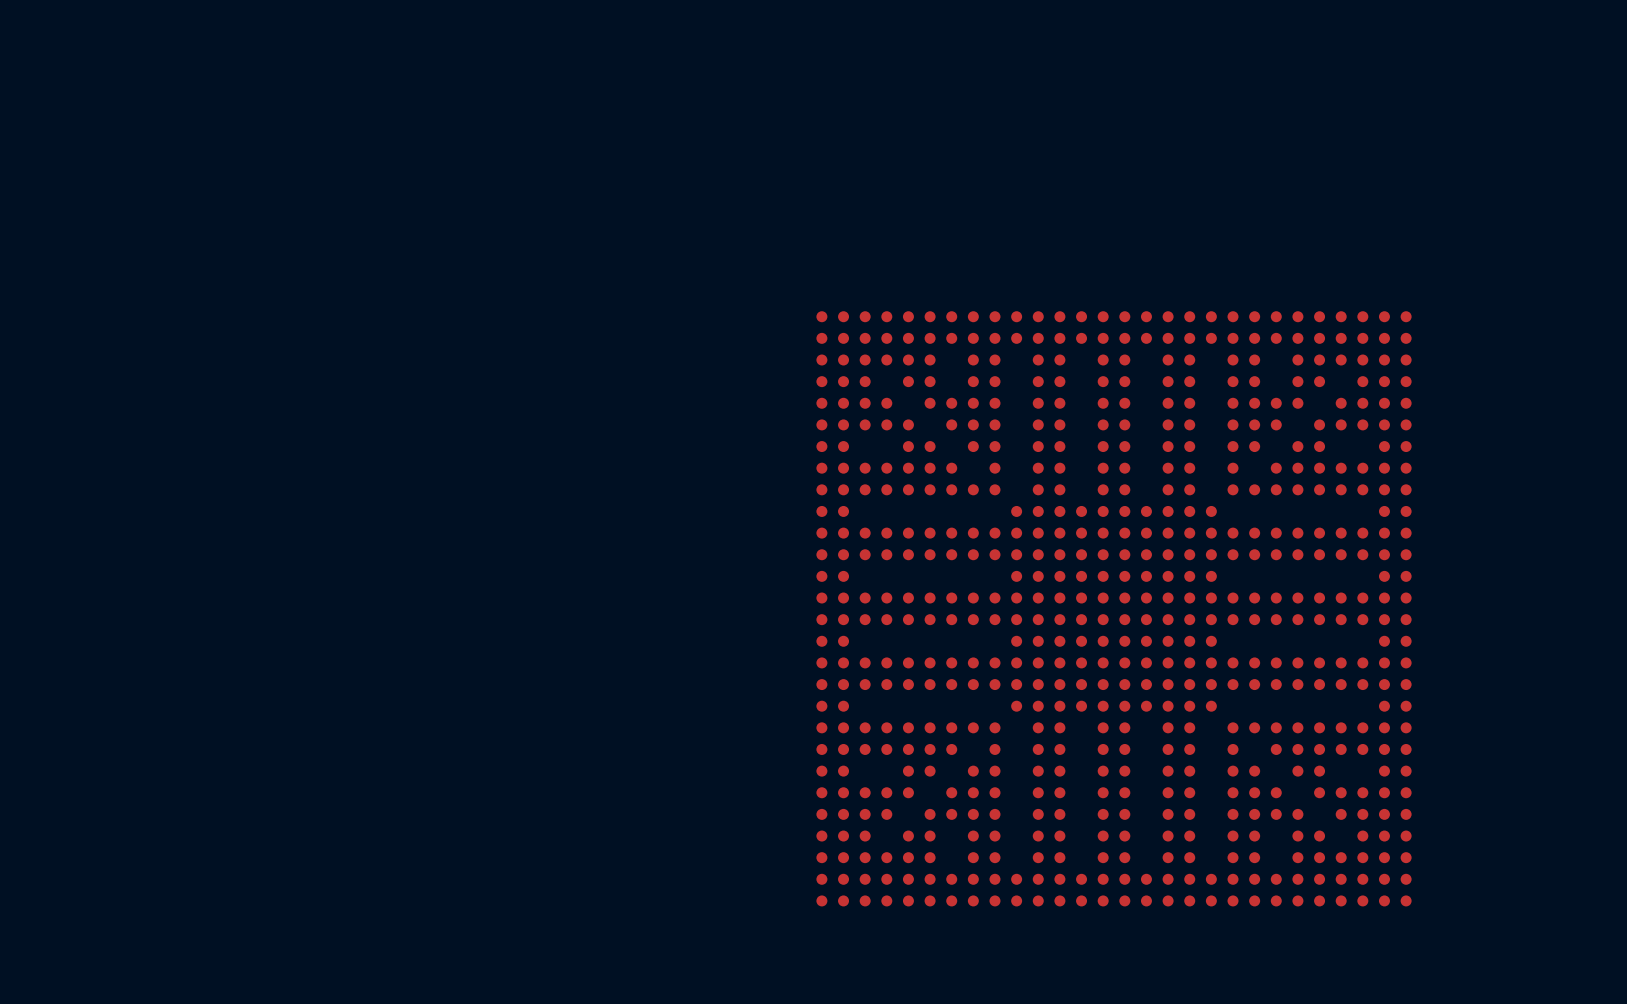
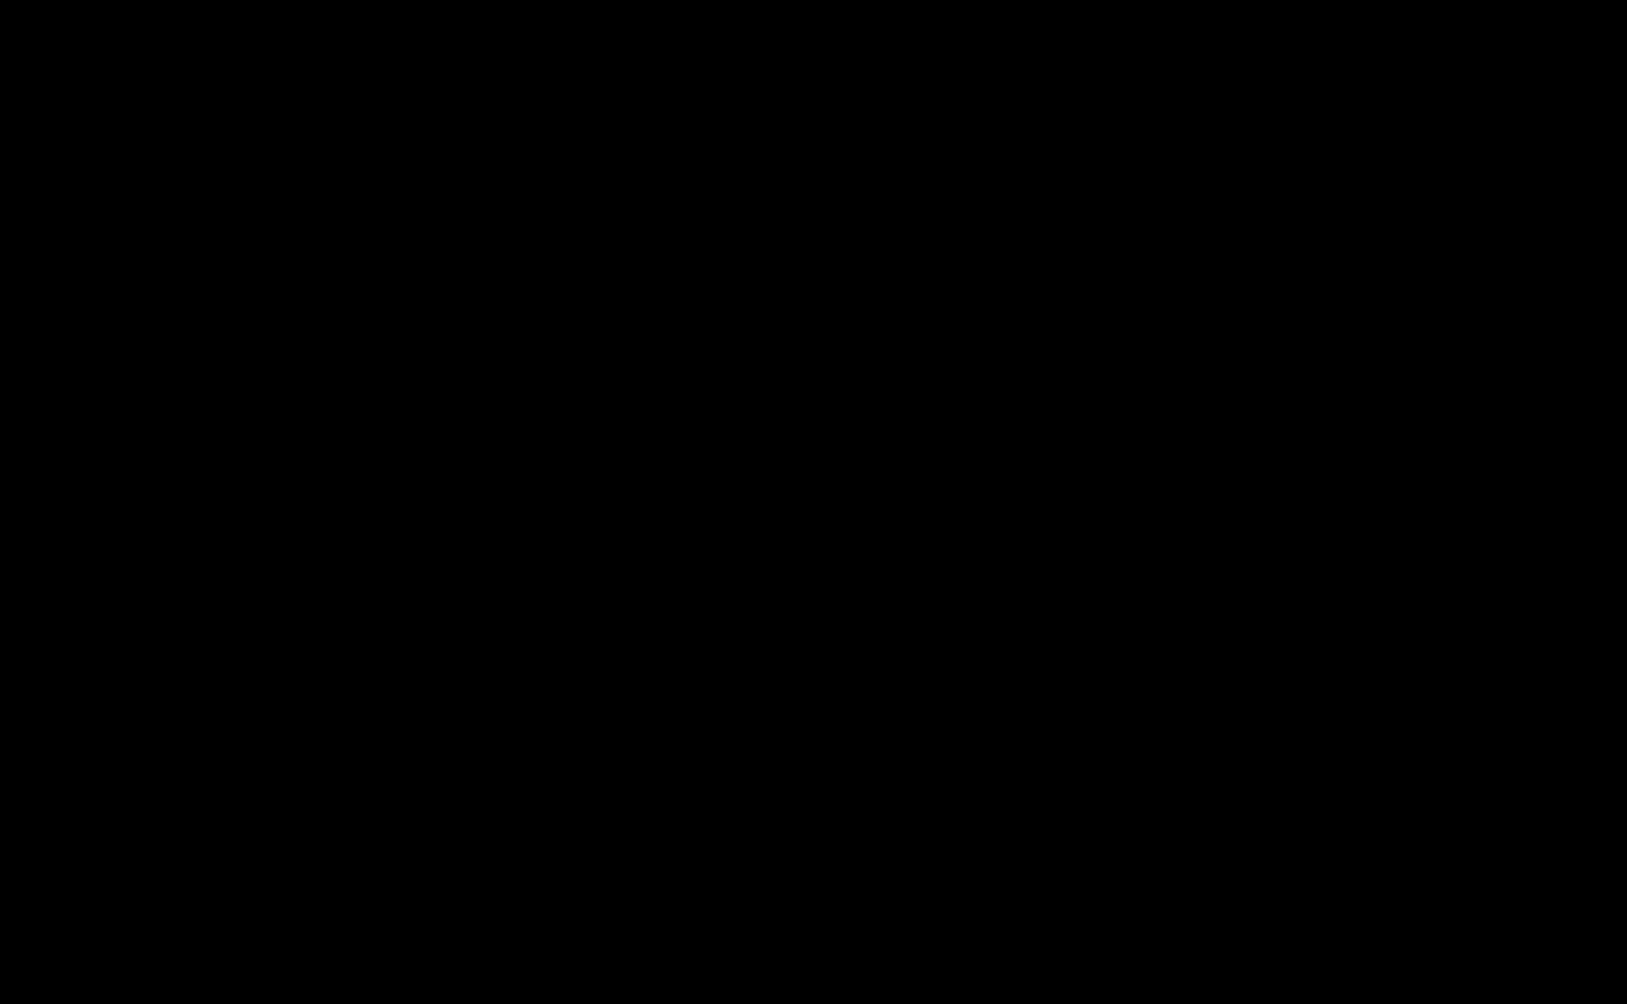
part: (1114, 608) -> none

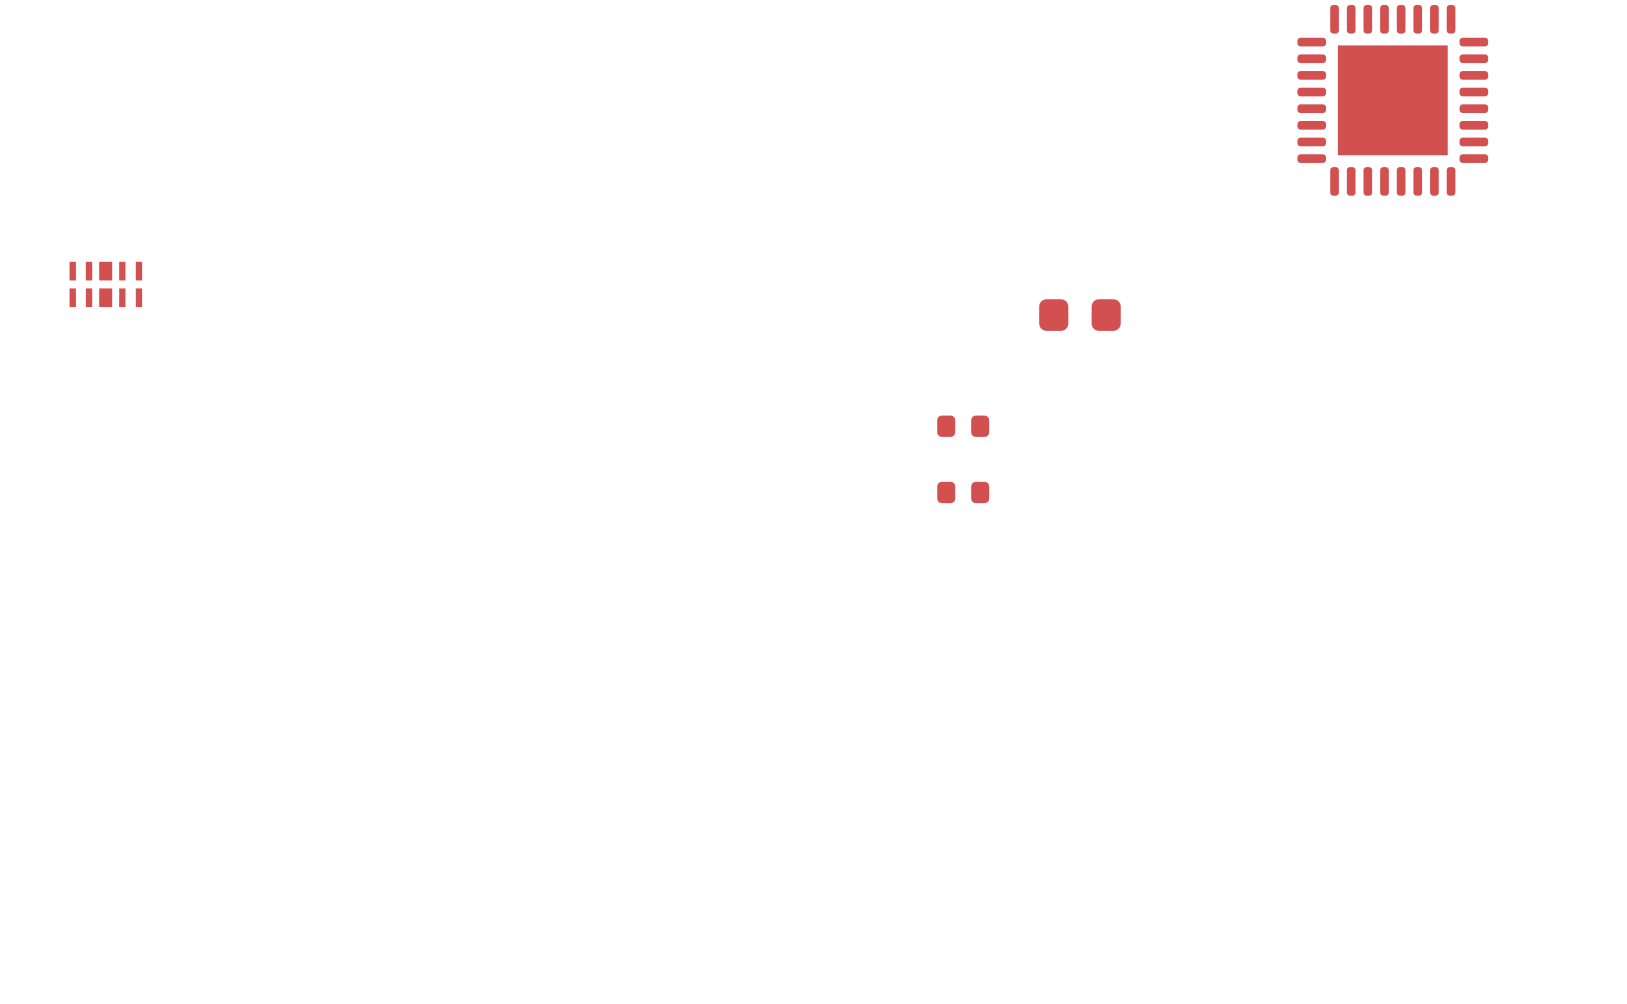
part: none -> (1392, 100)
part: none -> (105, 284)
part: none -> (1079, 315)
part: none -> (963, 426)
part: none -> (963, 492)

